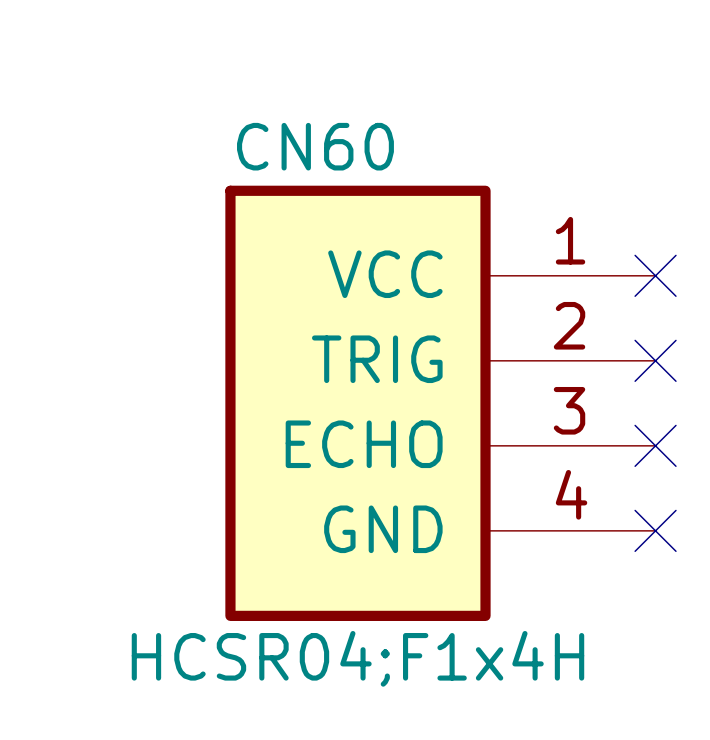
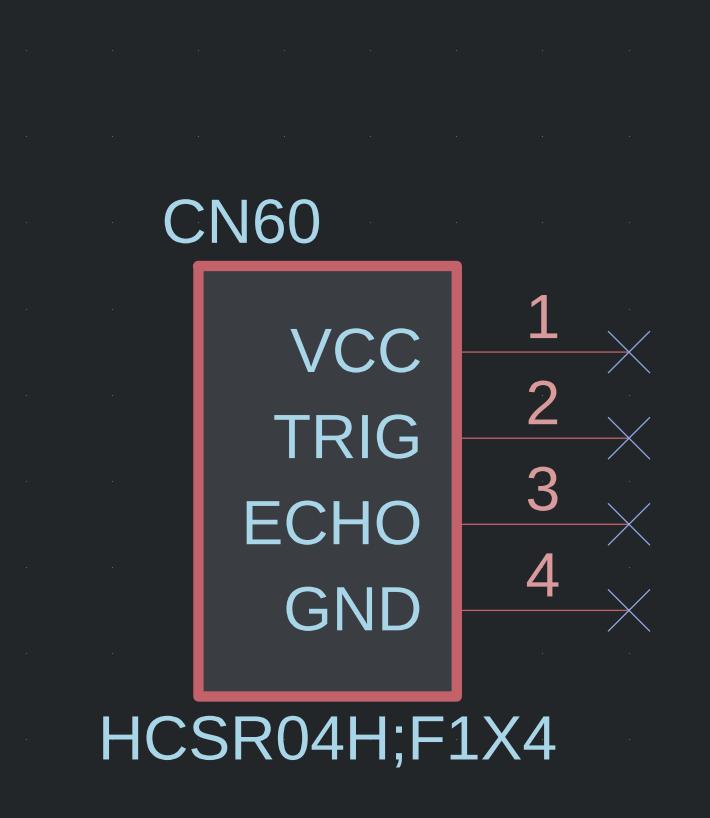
CN60 name position: CN60 (315, 146) -> CN60 (241, 221)
CN60 value: HCSR04;F1x4H (357, 658) -> HCSR04H;F1X4 (329, 741)

